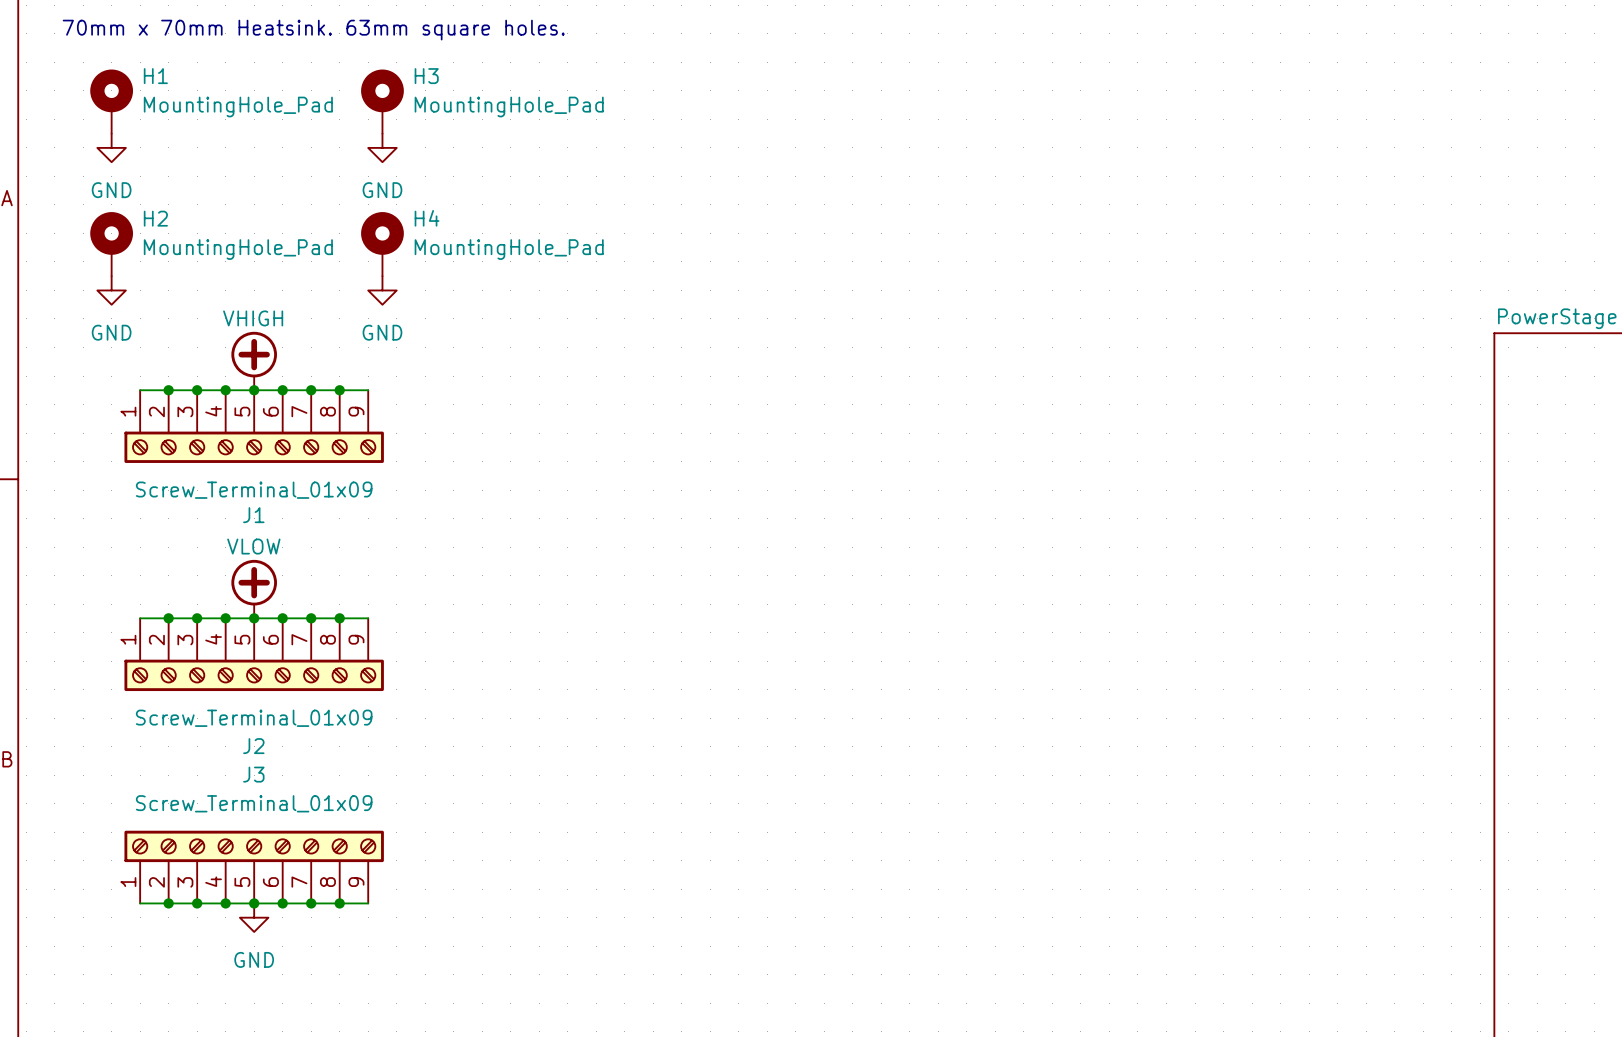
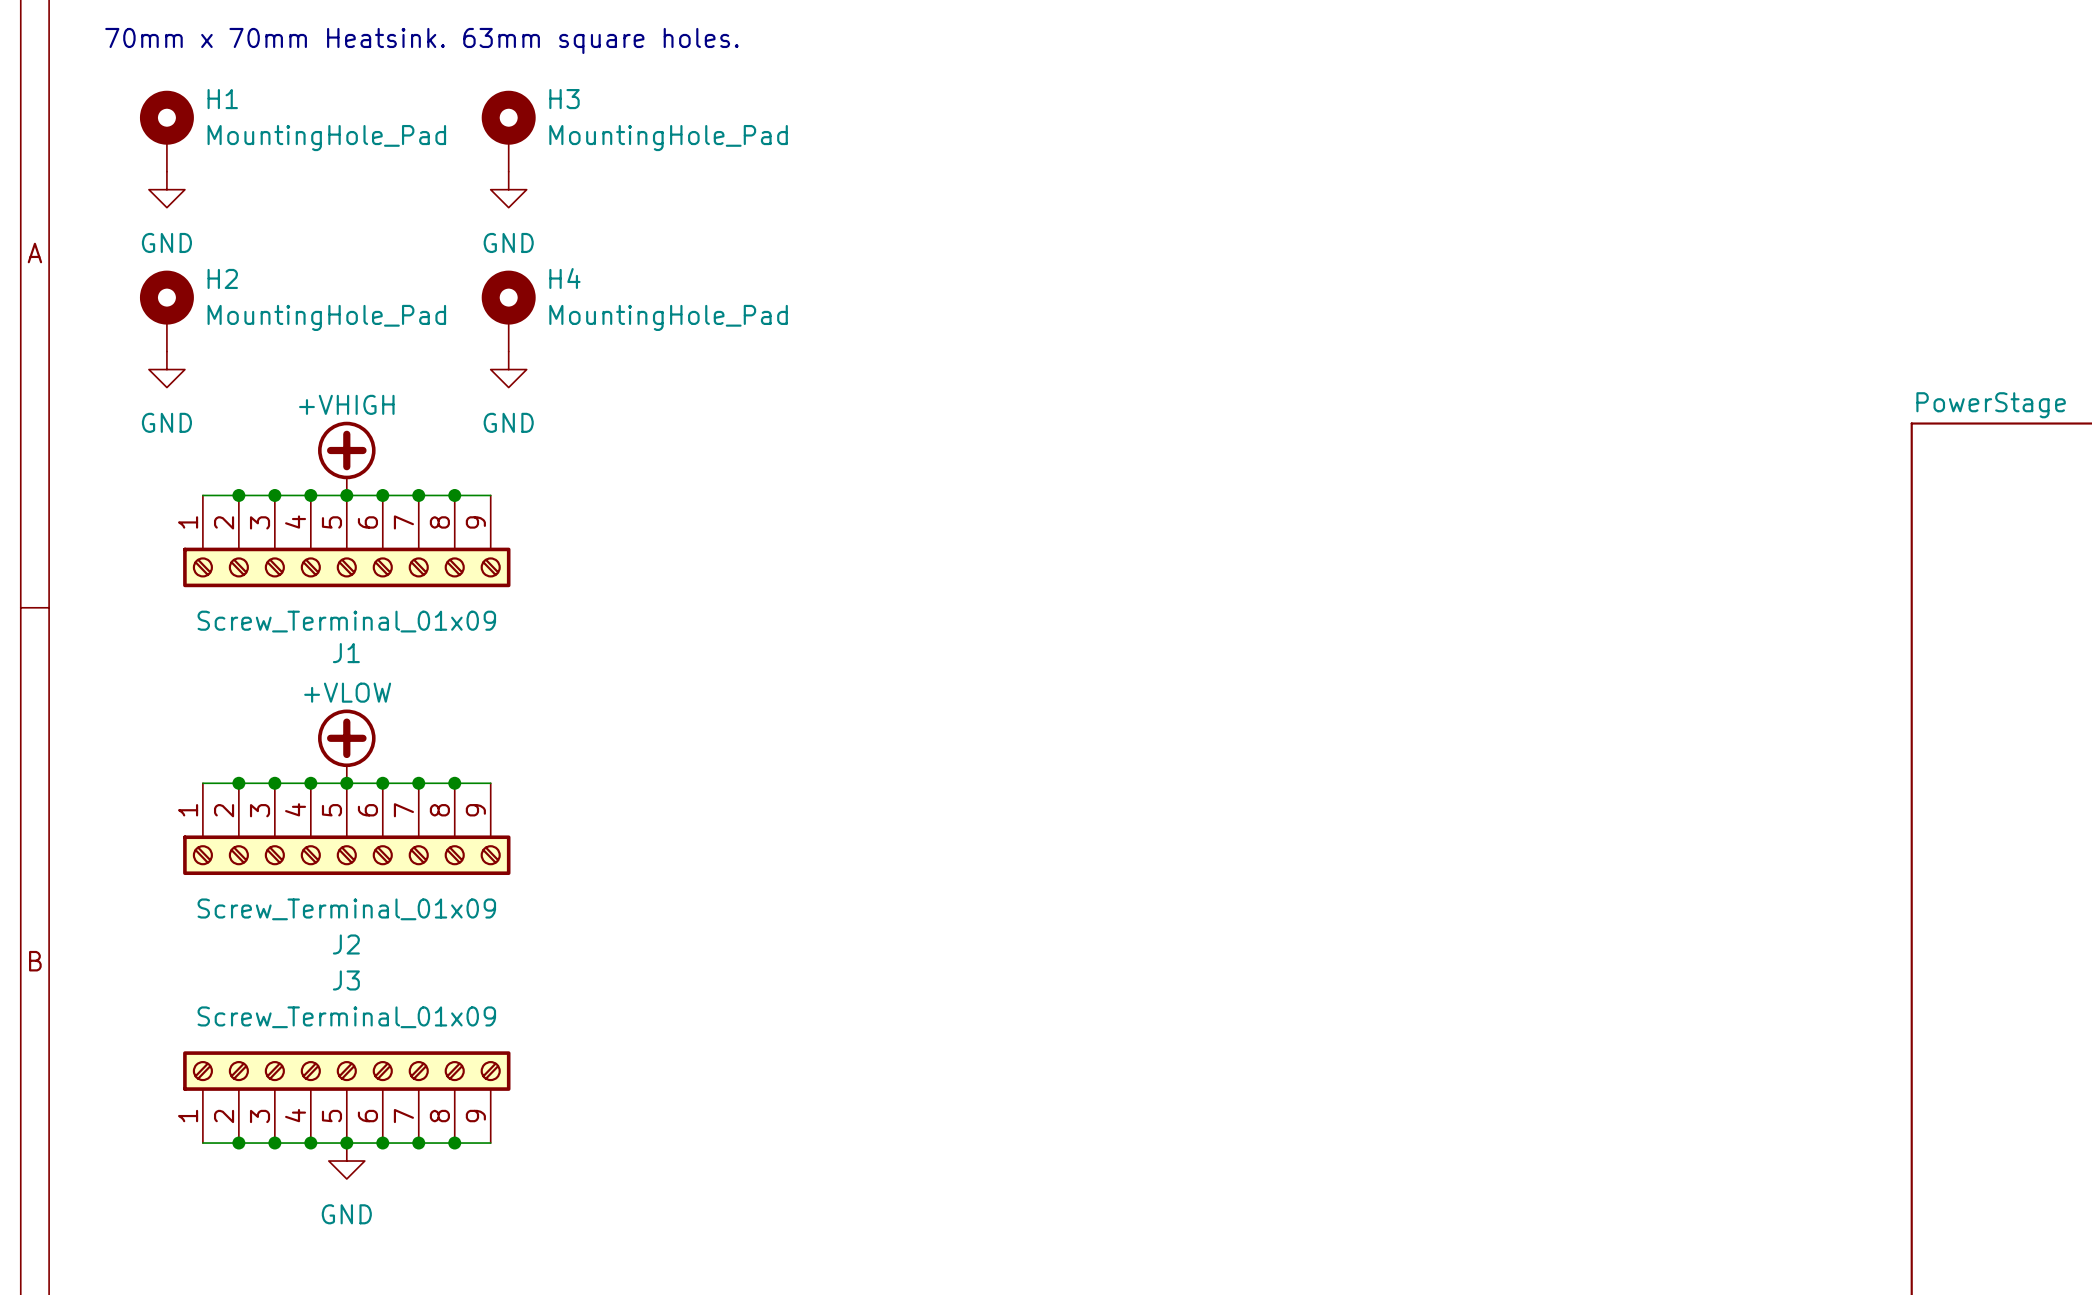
power symbol: VHIGH (254, 361) -> +VHIGH (346, 458)
power symbol: VLOW (254, 589) -> +VLOW (346, 746)

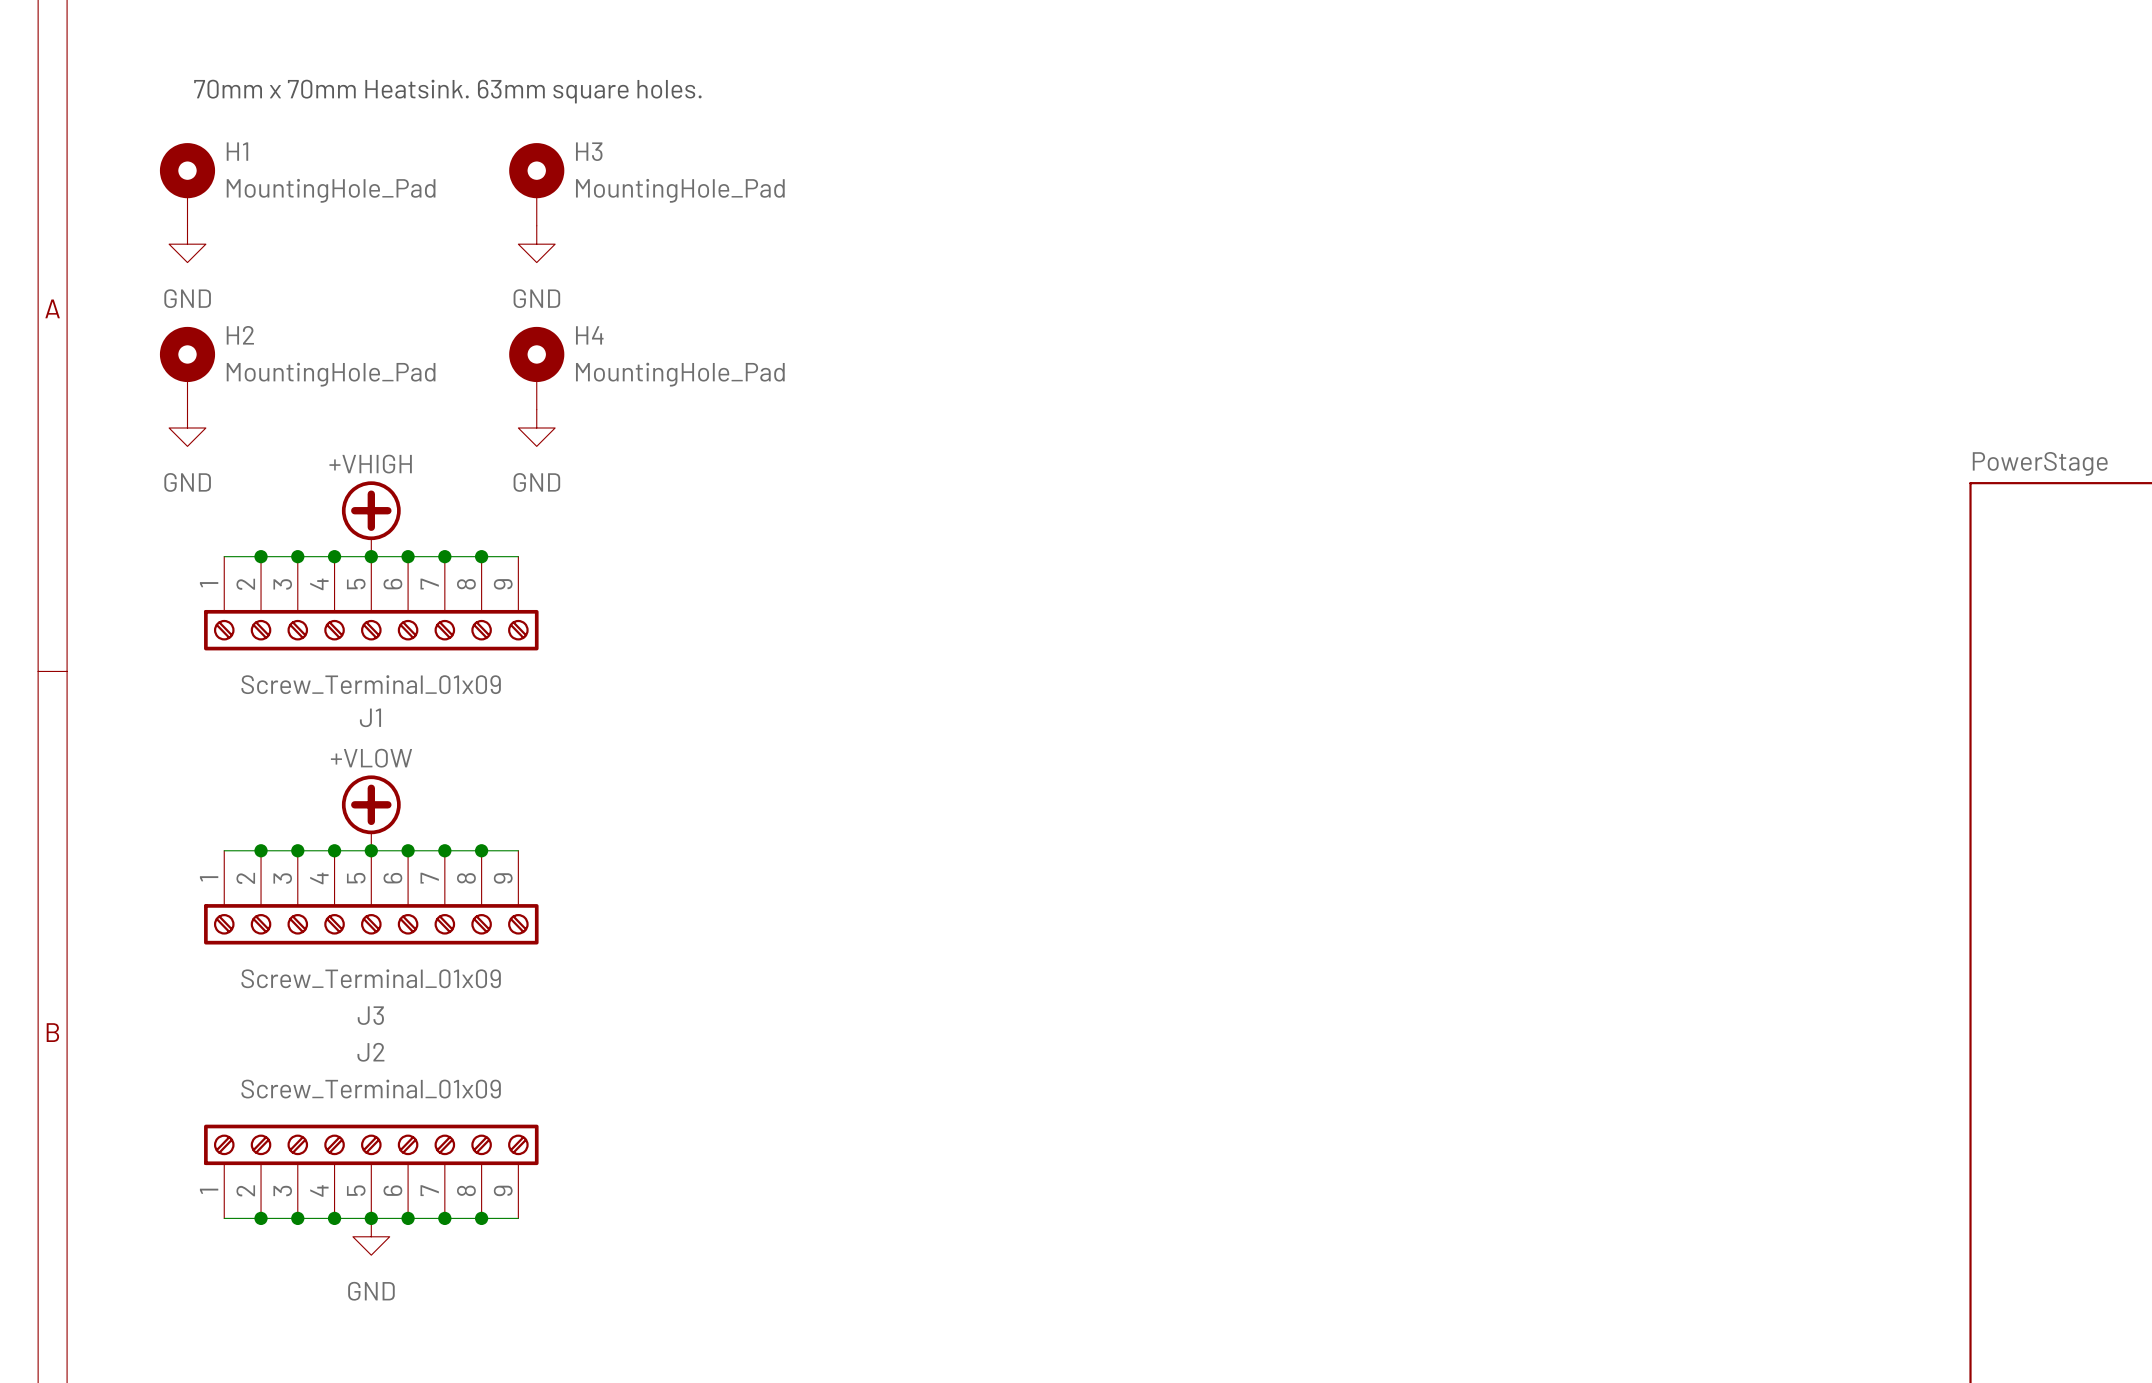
J2 name: J2 (346, 944) -> J3 (370, 1015)
J3 name: J3 (346, 980) -> J2 (370, 1052)

